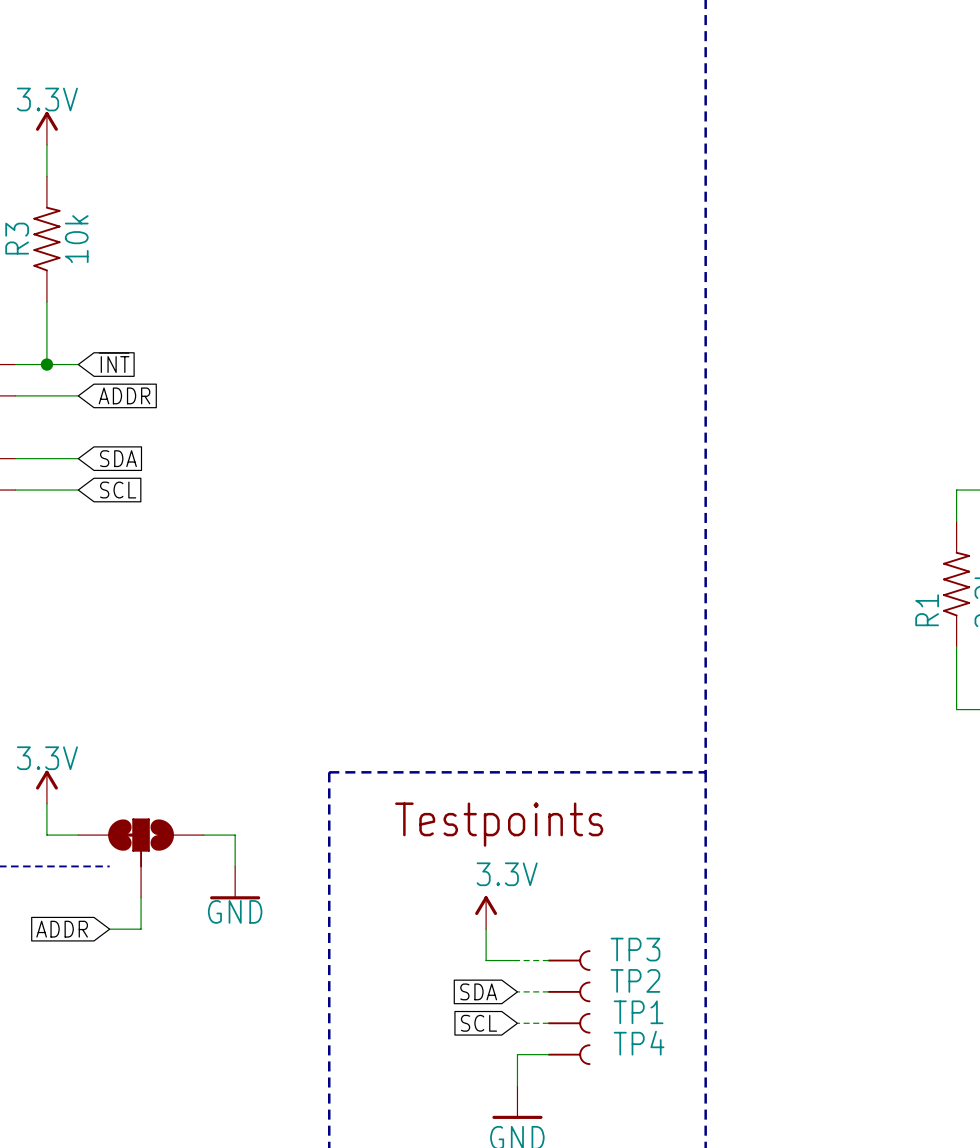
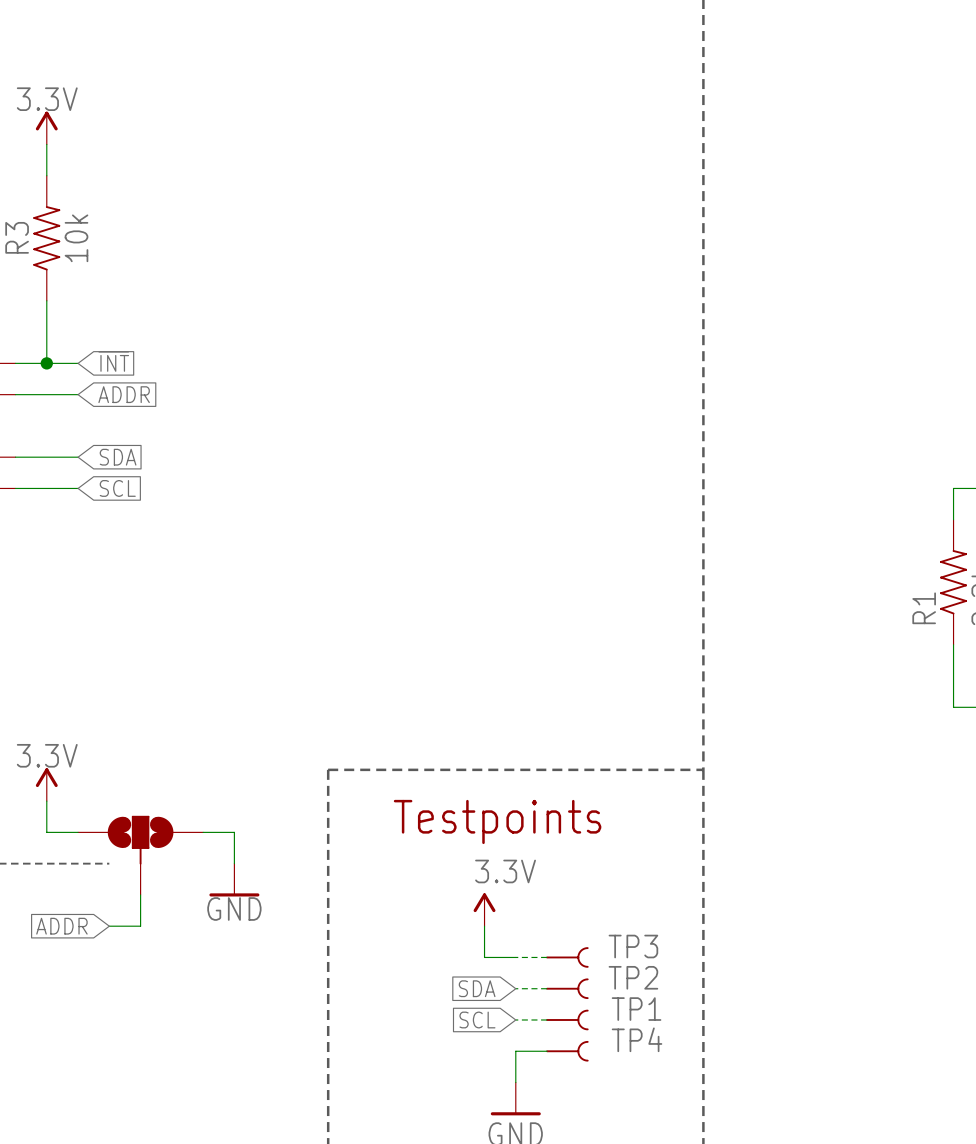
part symbol: [78, 818, 204, 898] -> [78, 815, 204, 895]

